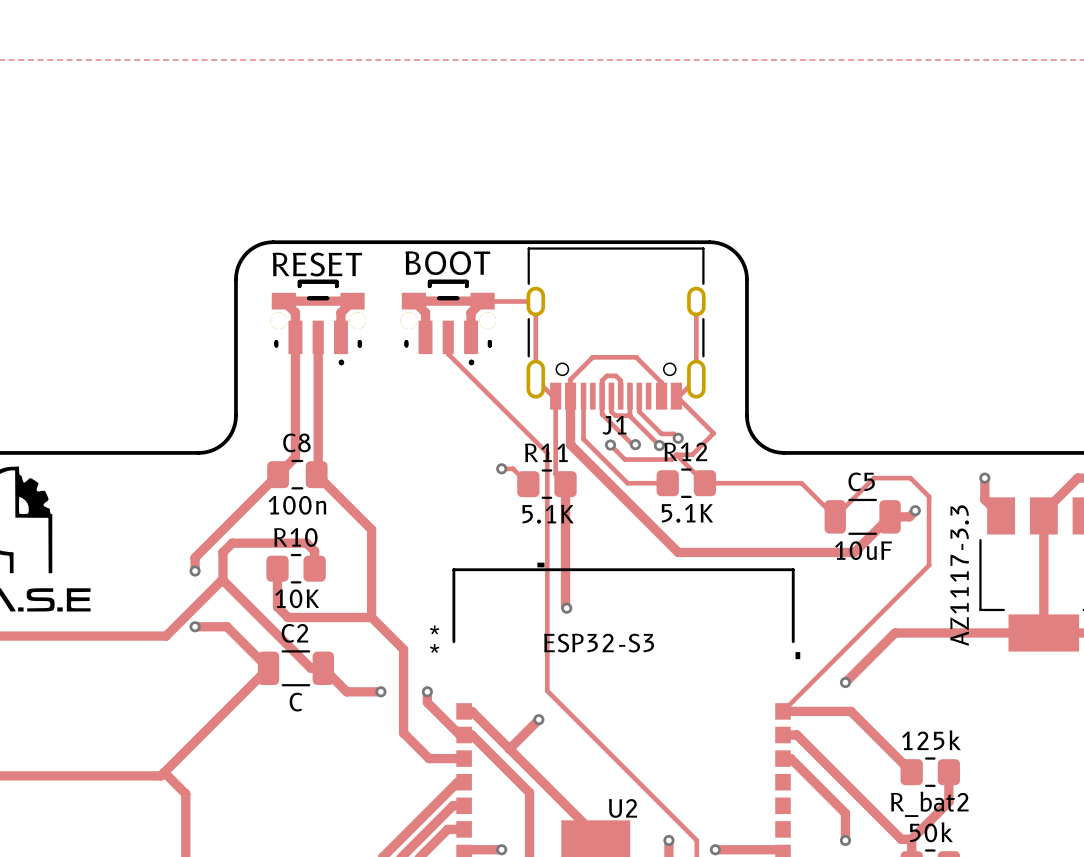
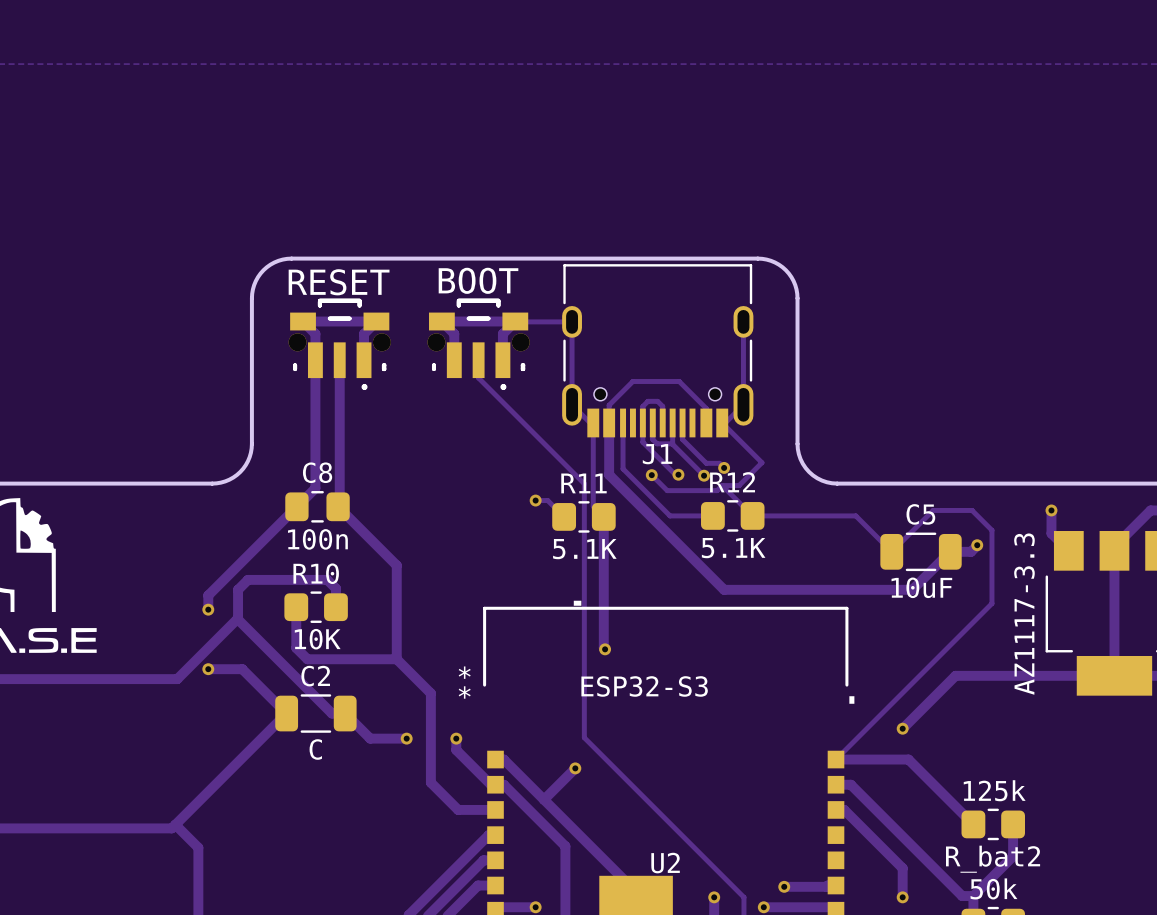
track: none -> (836, 885) (784, 886)
via: none -> (784, 886)

